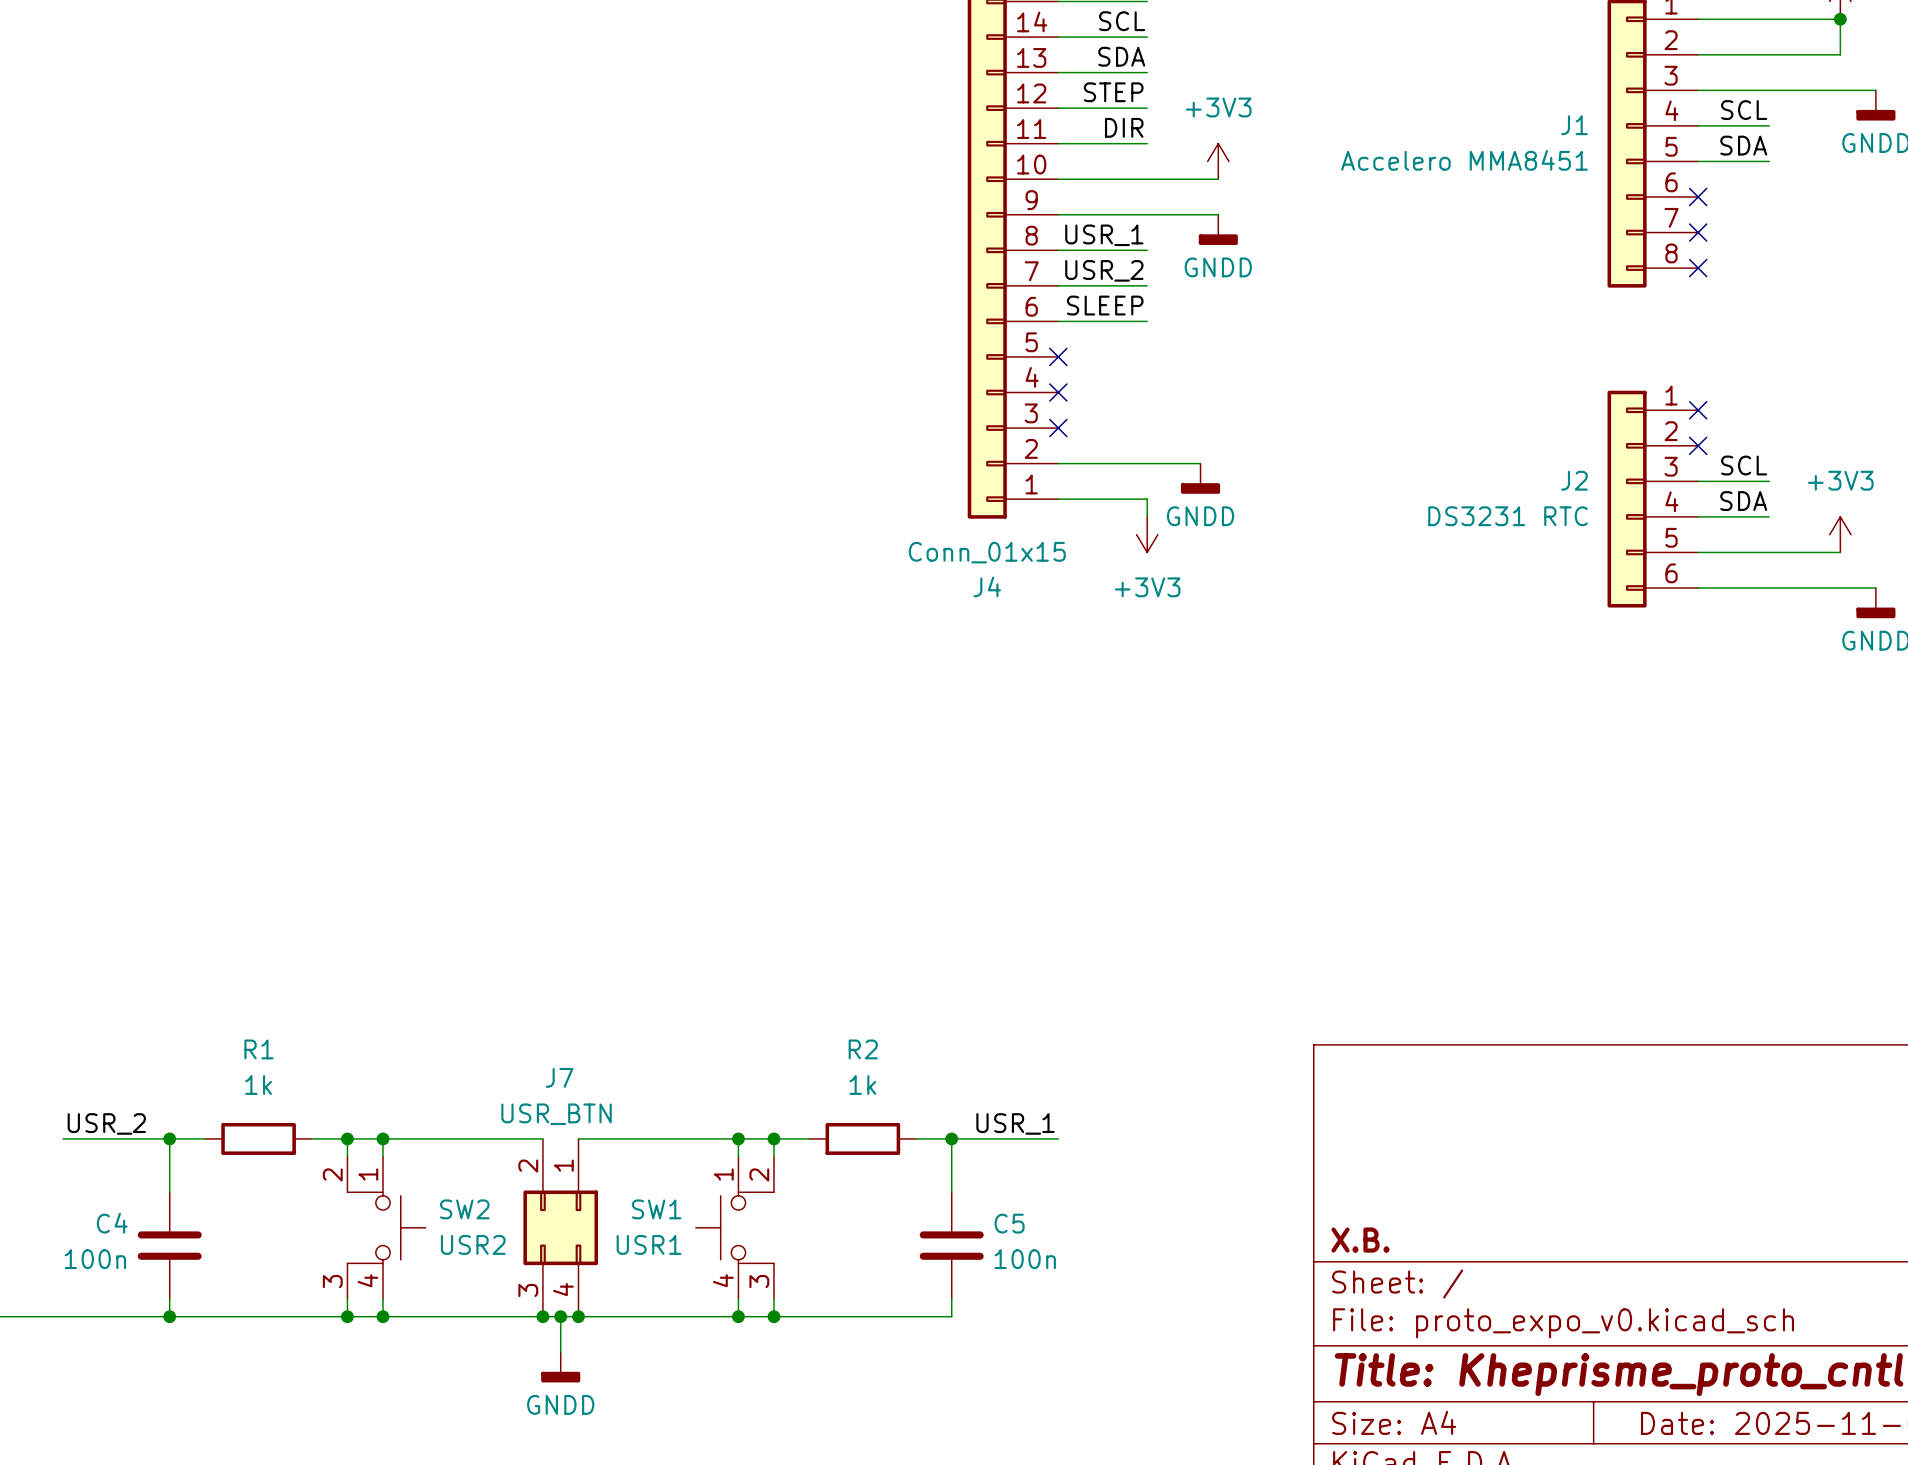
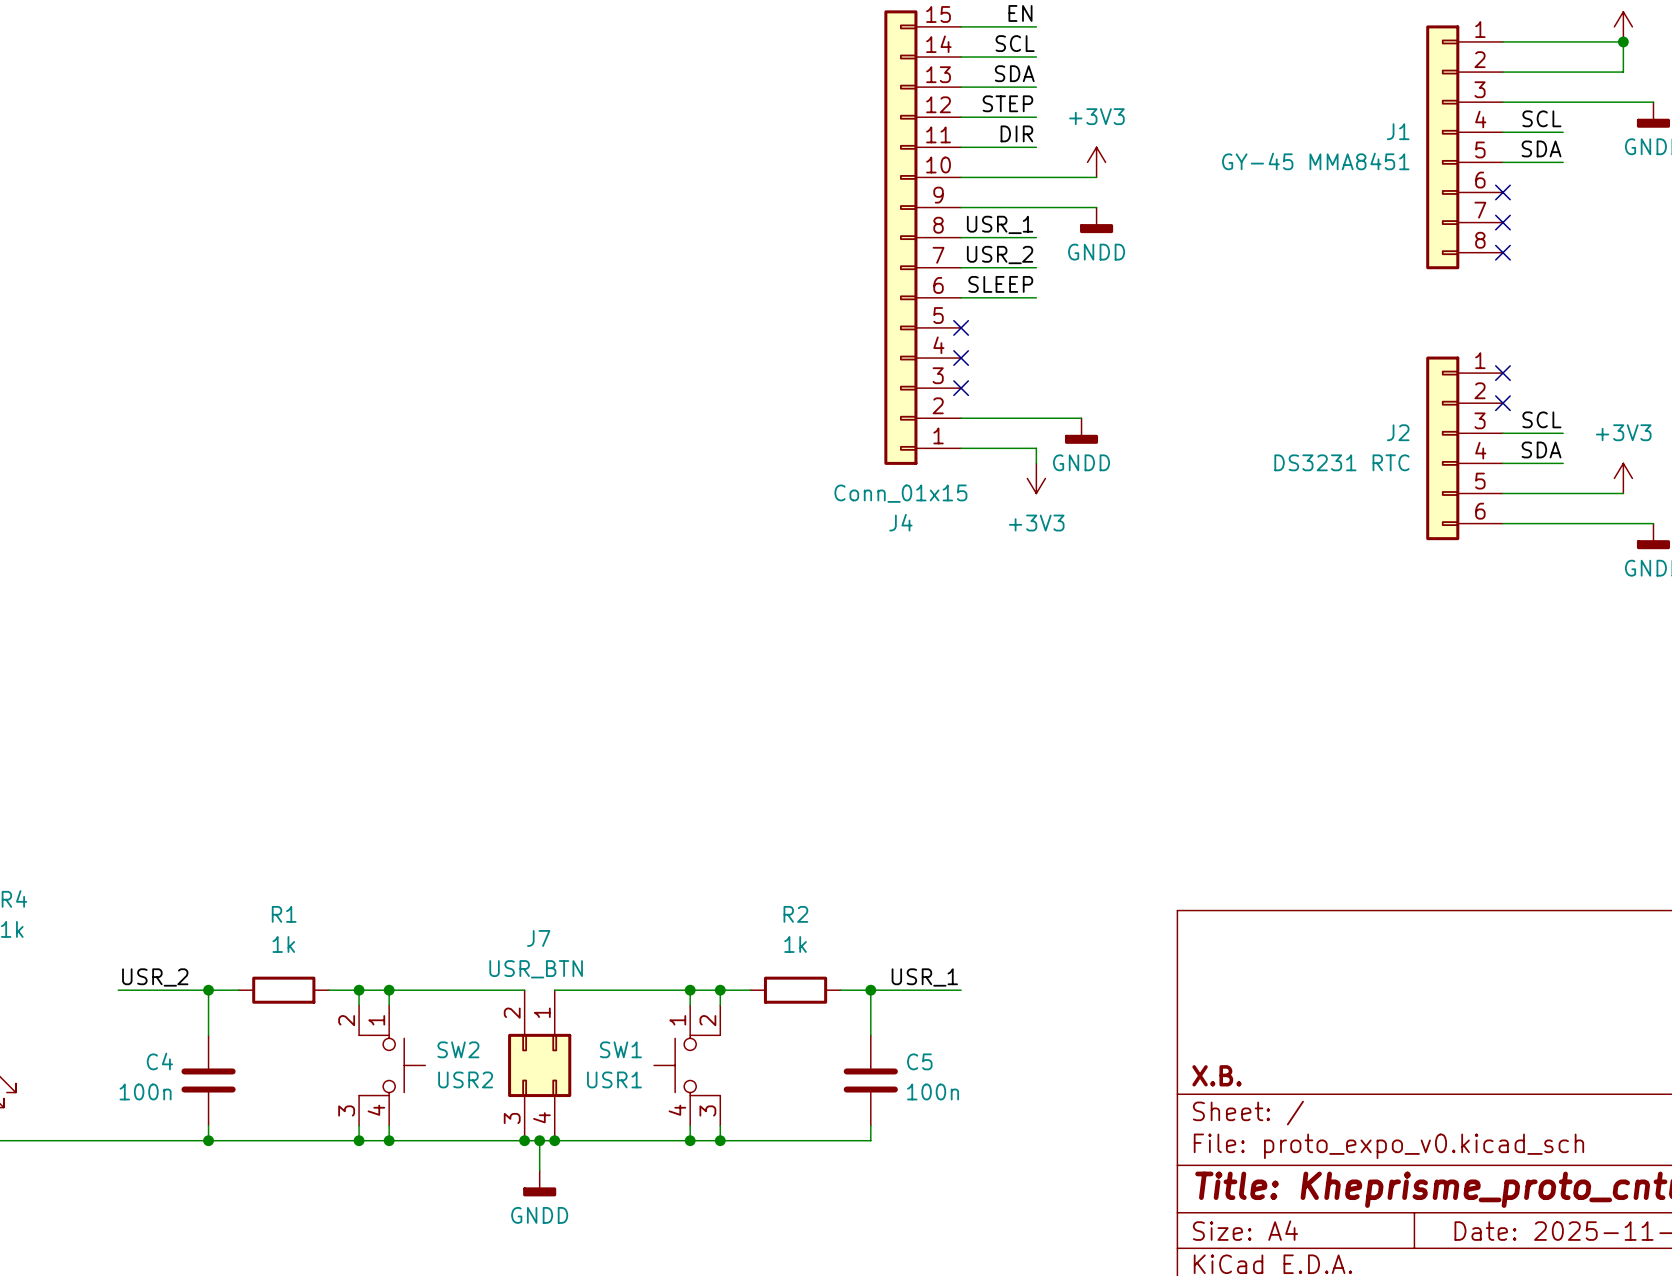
J1 value: Accelero MMA8451 (1464, 160) -> GY-45 MMA8451 (1315, 161)

